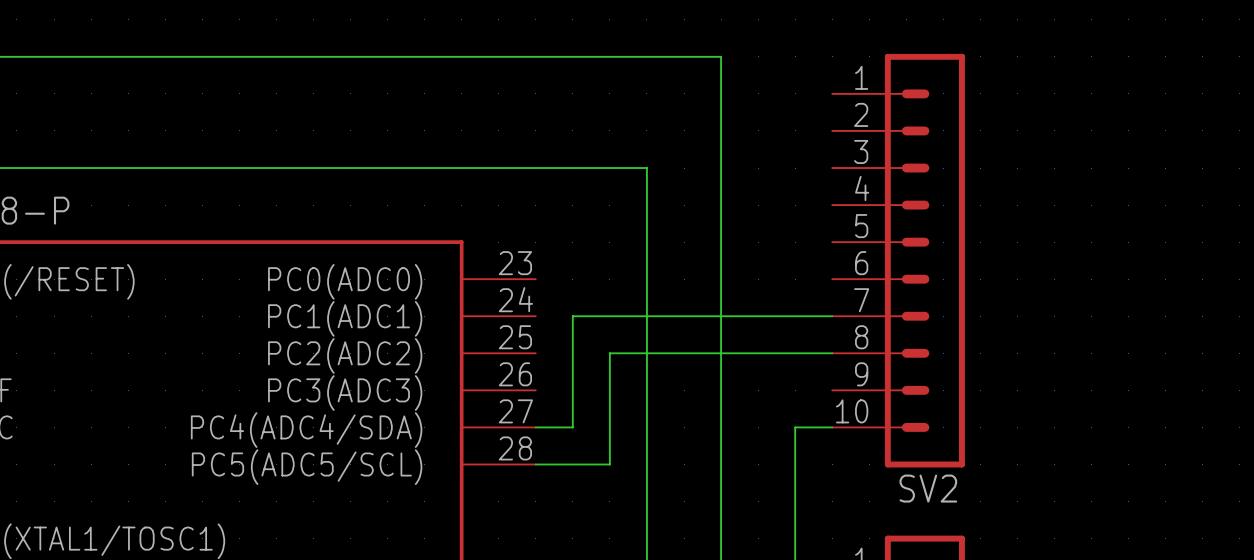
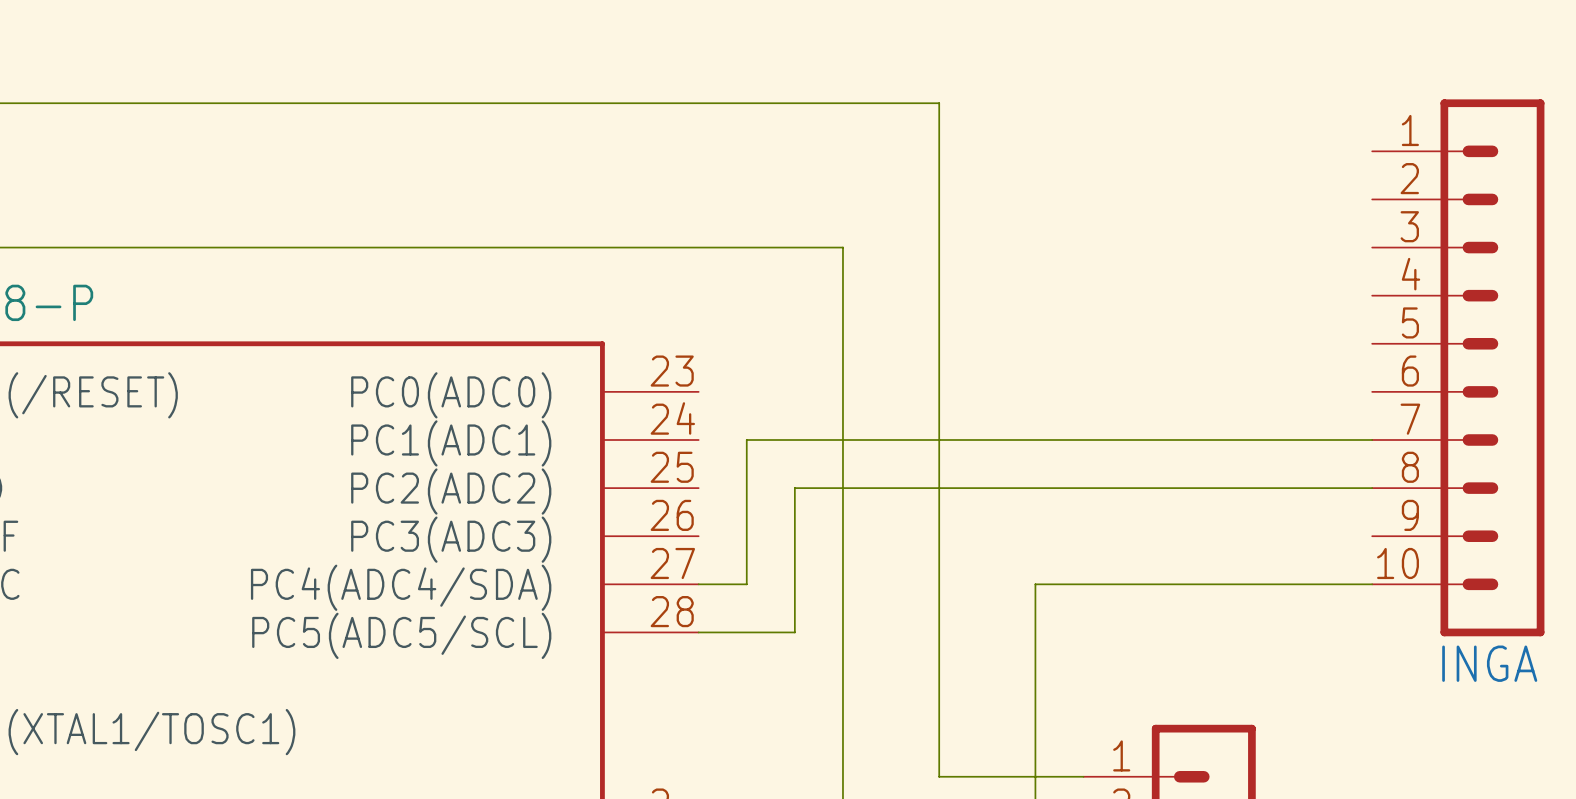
SV2: (898, 260) -> none
INGA: none -> (1458, 367)
wire: none -> (1083, 439) (1372, 439)
wire: none -> (1083, 488) (1372, 488)
wire: none -> (1083, 584) (1372, 584)

